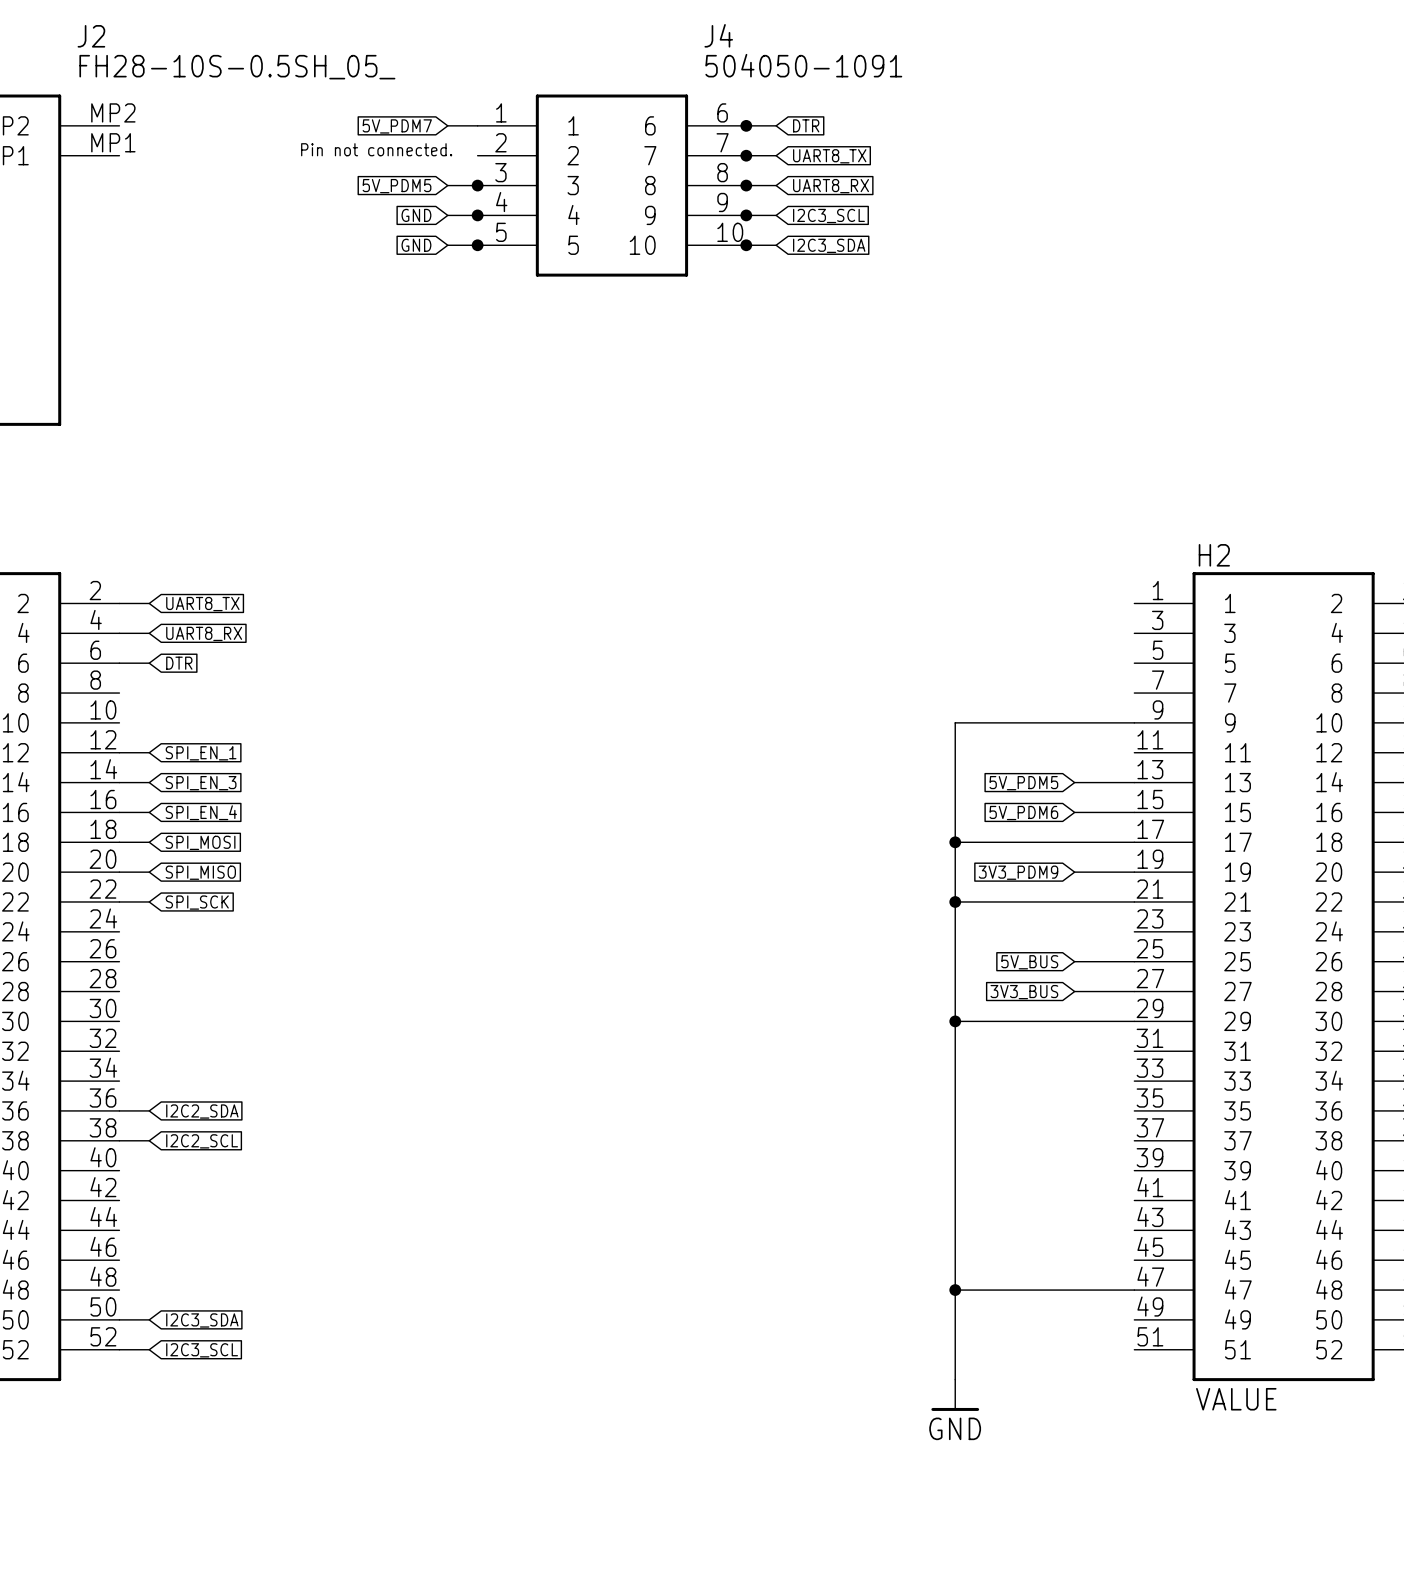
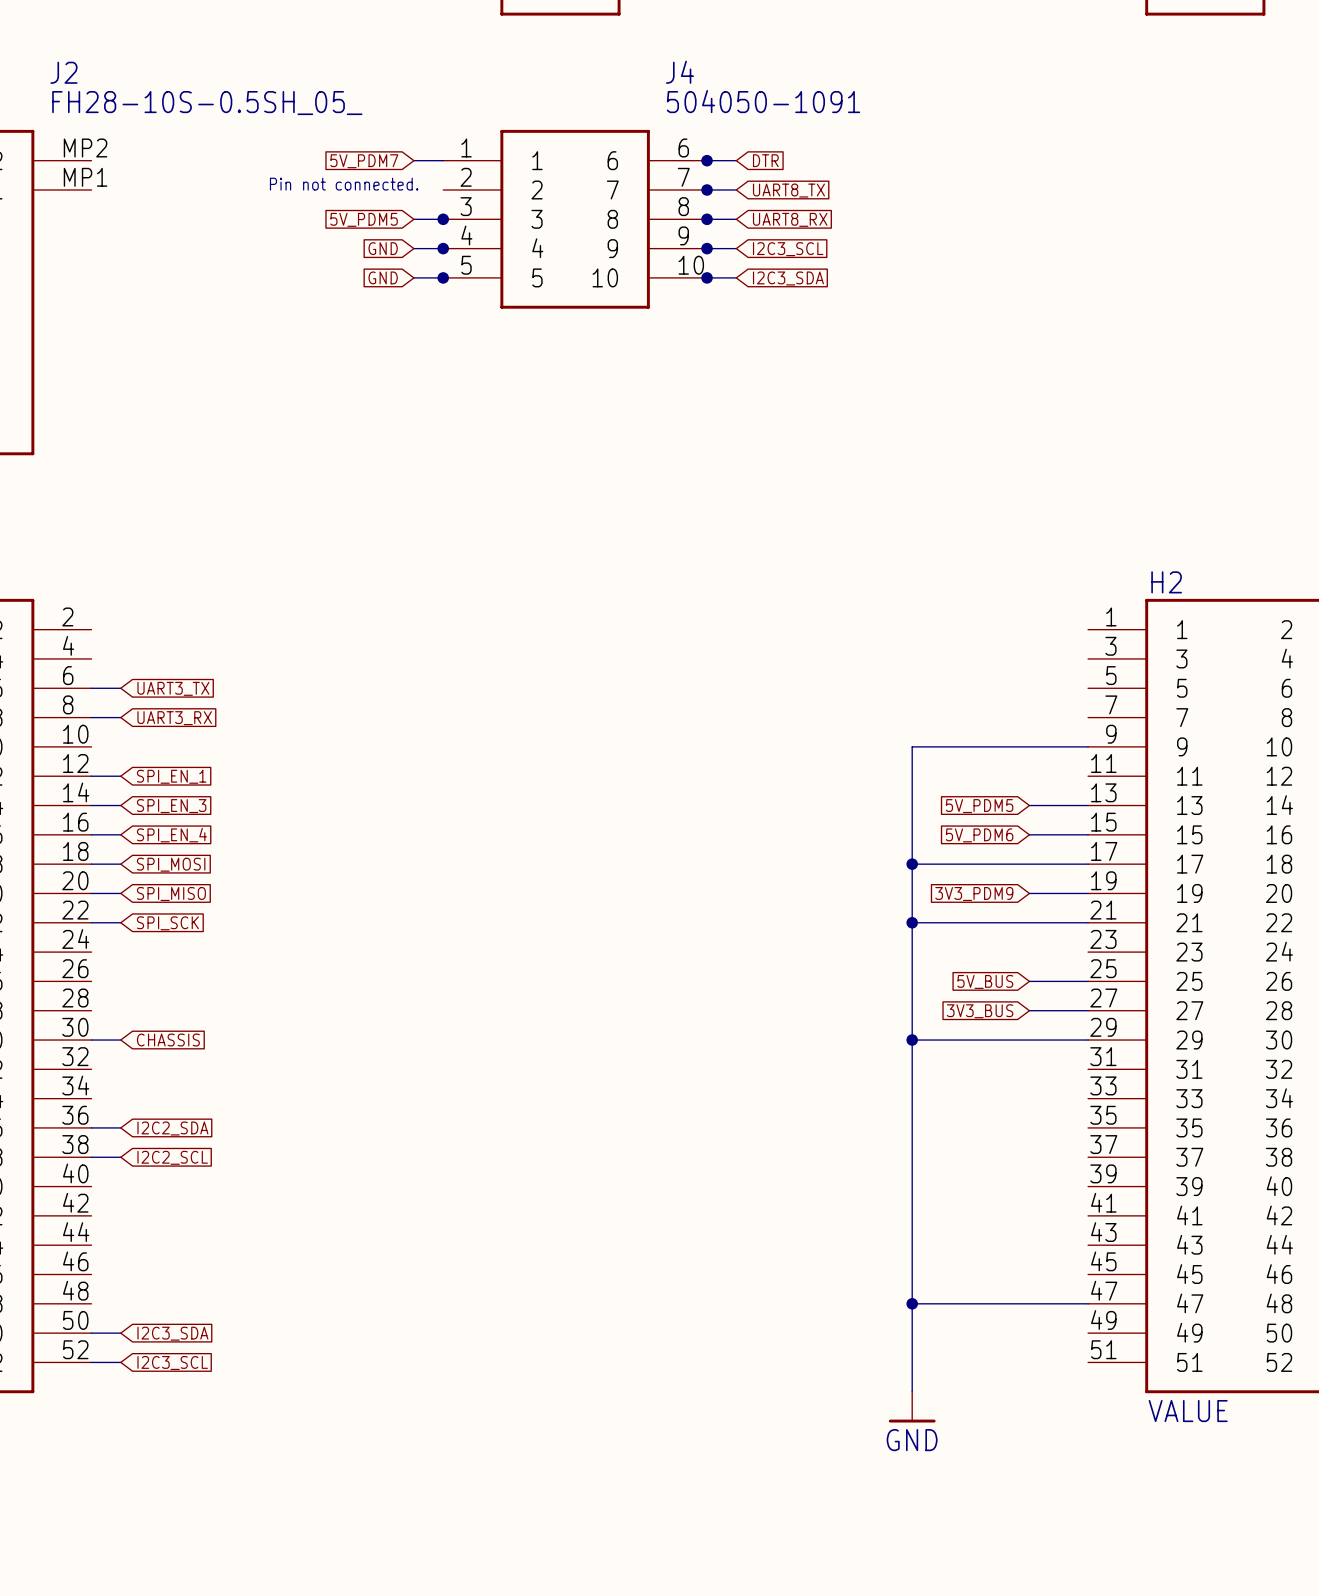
wire: (119, 603) (149, 603) -> none
global label: UART8_TX (202, 604) -> none
wire: (119, 633) (149, 633) -> (91, 717) (120, 717)
global label: UART8_RX (204, 633) -> none
global label: DTR (179, 663) -> UART3_TX (173, 688)
global label: none -> UART3_RX (174, 718)
wire: none -> (91, 1040) (120, 1040)
global label: none -> CHASSIS (168, 1040)

